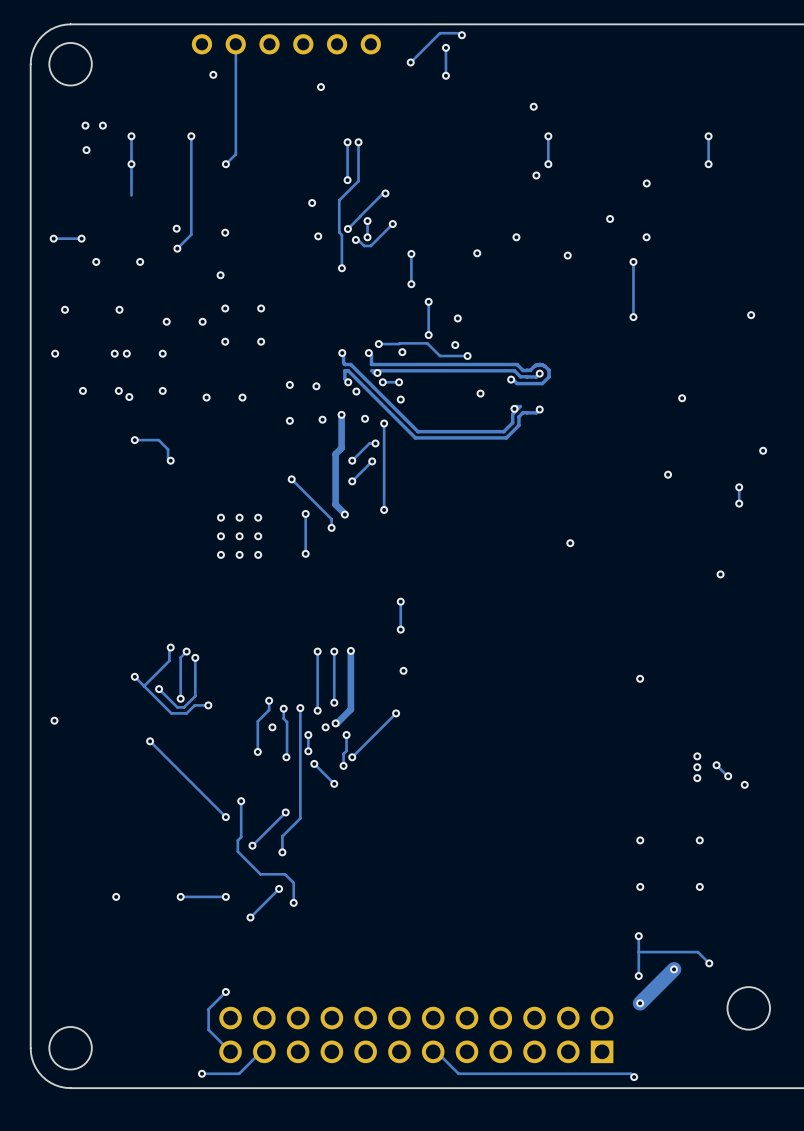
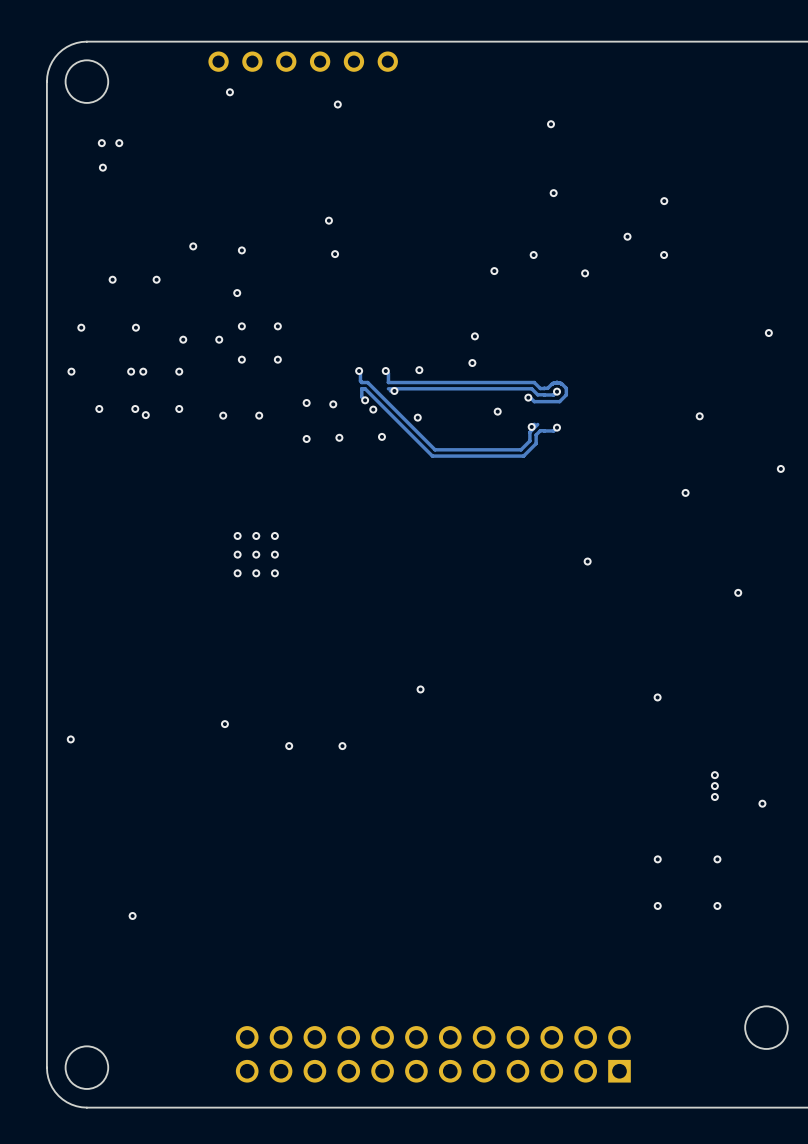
track: (461, 35) (459, 33) (439, 33) (410, 62) -> none
via: (461, 35) -> none
track: (235, 44) (235, 154) (225, 164) -> none
track: (445, 47) (445, 75) -> none
via: (445, 47) -> none
via: (410, 62) -> none
via: (445, 75) -> none
track: (131, 136) (131, 195) -> none
via: (131, 136) -> none
track: (191, 136) (191, 234) (177, 248) -> none
via: (191, 136) -> none
track: (548, 136) (548, 164) -> none
via: (548, 136) -> none
track: (708, 136) (708, 164) -> none
via: (708, 136) -> none
track: (347, 142) (347, 180) -> none
via: (347, 142) -> none
track: (358, 142) (358, 181) (339, 200) (341, 268) -> none
via: (358, 142) -> none
via: (131, 164) -> none
via: (225, 164) -> none
via: (548, 164) -> none
via: (708, 164) -> none
via: (347, 180) -> none
track: (385, 193) (383, 193) (347, 229) -> none
via: (385, 193) -> none
track: (367, 221) (367, 237) -> none
via: (367, 221) -> none
track: (392, 224) (370, 245) (364, 245) (355, 239) -> none
via: (392, 224) -> none
via: (347, 229) -> none
via: (367, 237) -> none
via: (53, 238) -> none
track: (81, 238) (53, 238) -> none
via: (81, 238) -> none
via: (355, 239) -> none
via: (177, 248) -> none
track: (411, 253) (411, 284) -> none
via: (411, 253) -> none
track: (633, 261) (633, 317) -> none
via: (633, 261) -> none
via: (341, 268) -> none
via: (411, 284) -> none
track: (428, 301) (428, 335) -> none
via: (428, 301) -> none
via: (633, 317) -> none
via: (428, 335) -> none
track: (378, 344) (427, 343) (439, 356) (467, 356) -> none
via: (378, 344) -> none
via: (467, 356) -> none
via: (382, 382) -> none
track: (399, 382) (382, 382) -> none
via: (399, 382) -> none
track: (341, 414) (341, 448) (335, 454) (335, 504) (344, 514) -> none
via: (341, 414) -> none
track: (384, 423) (384, 509) -> none
via: (384, 423) -> none
track: (134, 440) (158, 440) (168, 449) (168, 458) (170, 460) -> none
via: (134, 440) -> none
track: (375, 443) (369, 443) (352, 460) -> none
via: (375, 443) -> none
via: (170, 460) -> none
via: (352, 460) -> none
track: (372, 461) (352, 481) -> none
via: (372, 461) -> none
track: (291, 479) (331, 519) (331, 527) -> none
via: (291, 479) -> none
via: (352, 481) -> none
track: (739, 487) (739, 503) -> none
via: (739, 487) -> none
via: (739, 503) -> none
via: (384, 509) -> none
track: (305, 513) (305, 553) -> none
via: (305, 513) -> none
via: (344, 514) -> none
via: (331, 527) -> none
via: (305, 553) -> none
track: (400, 601) (400, 629) -> none
via: (400, 601) -> none
via: (400, 629) -> none
track: (170, 647) (169, 660) (144, 686) -> none
via: (170, 647) -> none
track: (350, 650) (350, 709) (335, 723) -> none
via: (350, 650) -> none
track: (186, 651) (180, 657) (180, 698) -> none
via: (186, 651) -> none
track: (317, 651) (317, 710) -> none
via: (317, 651) -> none
track: (334, 651) (334, 702) -> none
via: (334, 651) -> none
track: (195, 657) (195, 696) (184, 707) (177, 707) (159, 689) -> none
via: (195, 657) -> none
track: (134, 676) (171, 713) (186, 713) (194, 705) (208, 705) -> none
via: (134, 676) -> none
via: (159, 689) -> none
via: (180, 698) -> none
track: (269, 700) (269, 710) (257, 721) (257, 751) -> none
via: (269, 700) -> none
via: (334, 702) -> none
track: (283, 708) (283, 718) (287, 722) (287, 756) -> none
via: (283, 708) -> none
track: (300, 708) (300, 818) (282, 836) (282, 852) -> none
via: (300, 708) -> none
via: (317, 710) -> none
track: (396, 713) (352, 757) -> none
via: (396, 713) -> none
via: (335, 723) -> none
track: (308, 735) (308, 751) -> none
via: (308, 735) -> none
track: (346, 735) (346, 750) (343, 753) (343, 765) -> none
via: (346, 735) -> none
track: (150, 741) (225, 817) -> none
via: (150, 741) -> none
via: (257, 751) -> none
via: (308, 751) -> none
via: (286, 757) -> none
via: (352, 757) -> none
track: (314, 763) (334, 783) -> none
via: (314, 763) -> none
via: (343, 765) -> none
track: (716, 765) (727, 776) -> none
via: (716, 765) -> none
via: (728, 776) -> none
via: (334, 783) -> none
track: (241, 801) (241, 837) (237, 840) (237, 851) (260, 874) (285, 874) (293, 882) (293, 902) -> none
via: (241, 801) -> none
track: (285, 812) (252, 845) -> none
via: (285, 812) -> none
via: (225, 817) -> none
via: (252, 845) -> none
via: (282, 852) -> none
track: (279, 888) (250, 917) -> none
via: (279, 888) -> none
via: (180, 896) -> none
track: (225, 896) (180, 896) -> none
via: (225, 896) -> none
via: (293, 902) -> none
via: (250, 917) -> none
track: (638, 936) (638, 976) -> none
via: (638, 936) -> none
track: (638, 952) (697, 952) (709, 963) -> none
via: (709, 963) -> none
track: (674, 969) (640, 1003) -> none
via: (674, 969) -> none
via: (638, 976) -> none
track: (225, 991) (208, 1009) (208, 1029) (230, 1051) -> none
via: (225, 991) -> none
via: (640, 1003) -> none
track: (261, 1051) (239, 1073) (201, 1073) -> none
track: (436, 1051) (458, 1073) (630, 1073) (634, 1077) -> none
via: (201, 1073) -> none
via: (634, 1077) -> none

